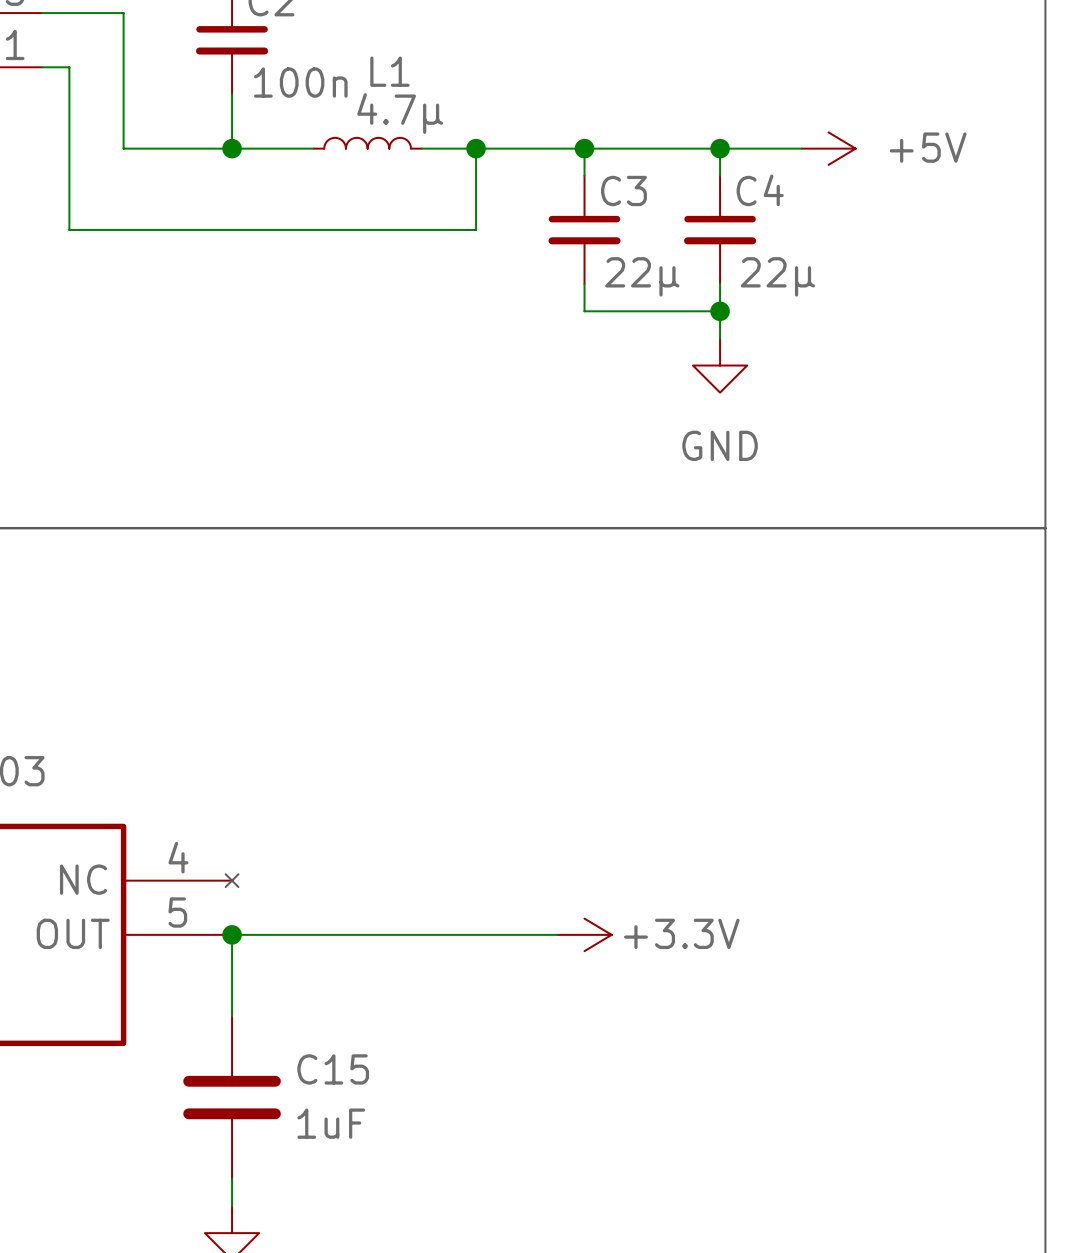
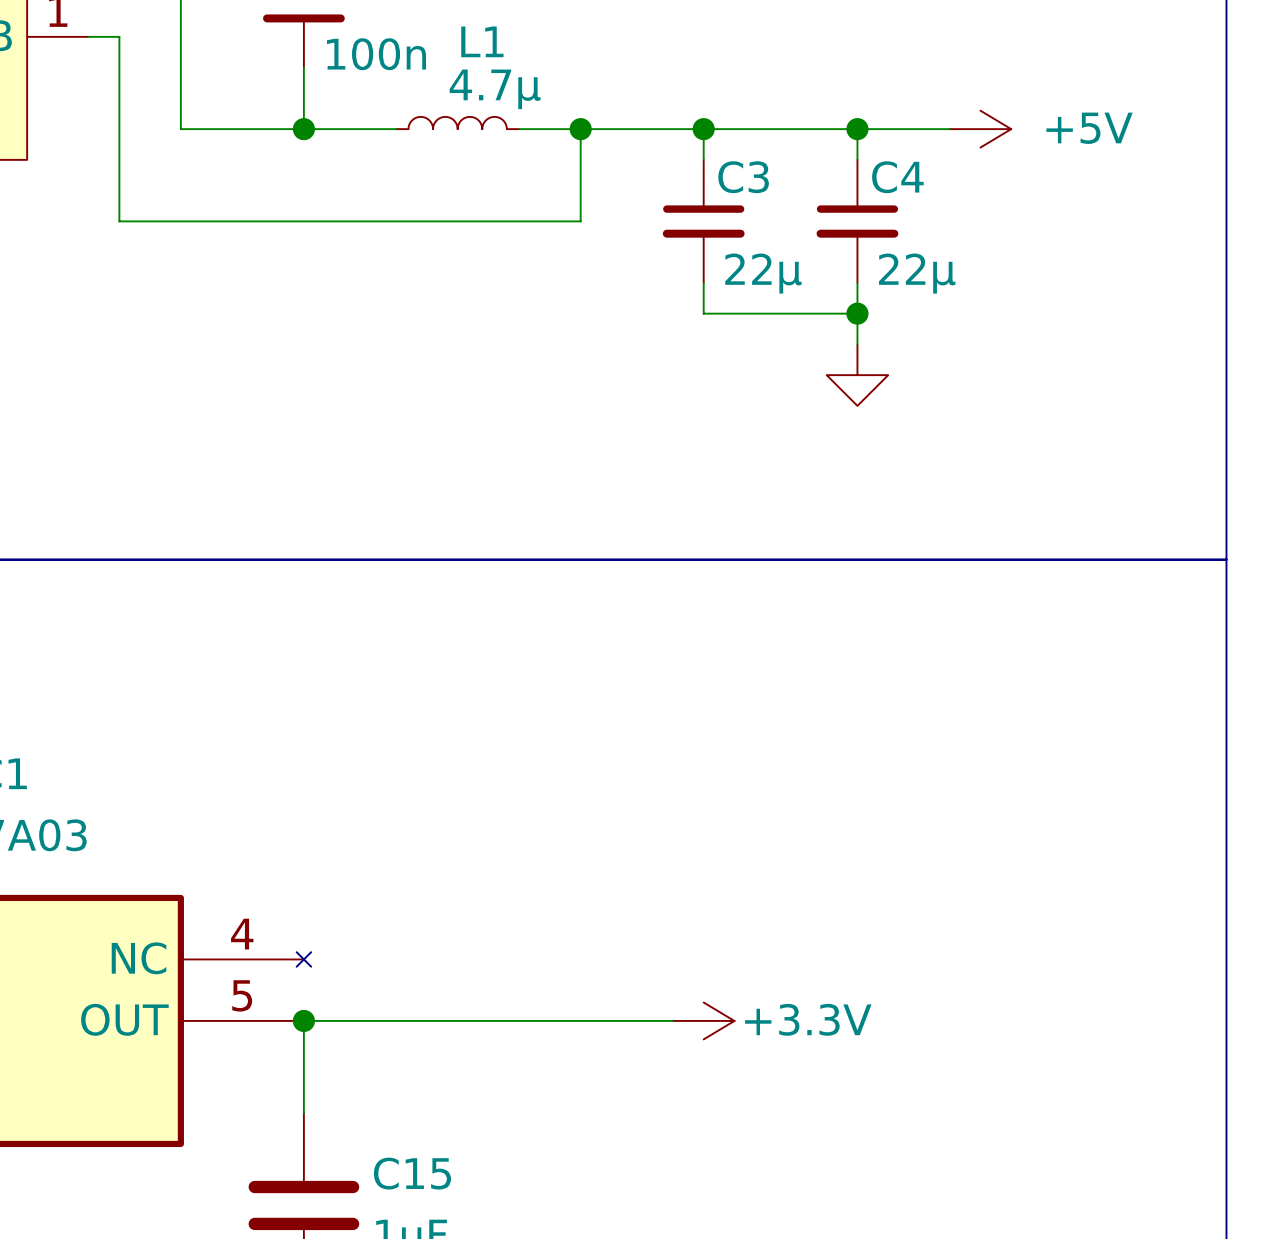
power symbol text: GND (720, 445) -> none

